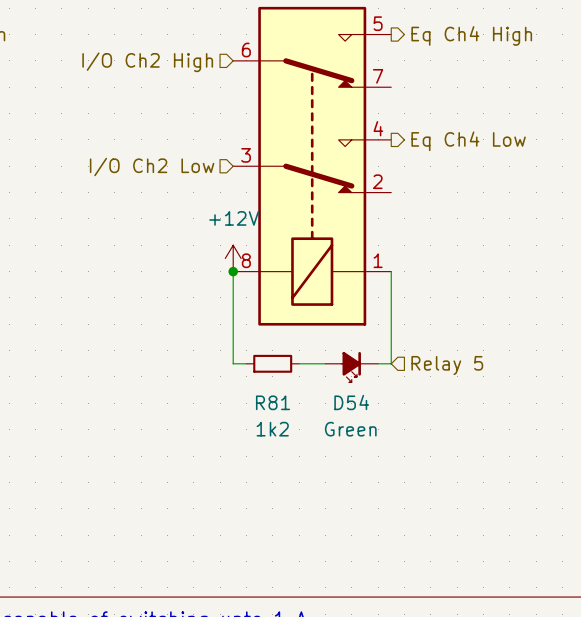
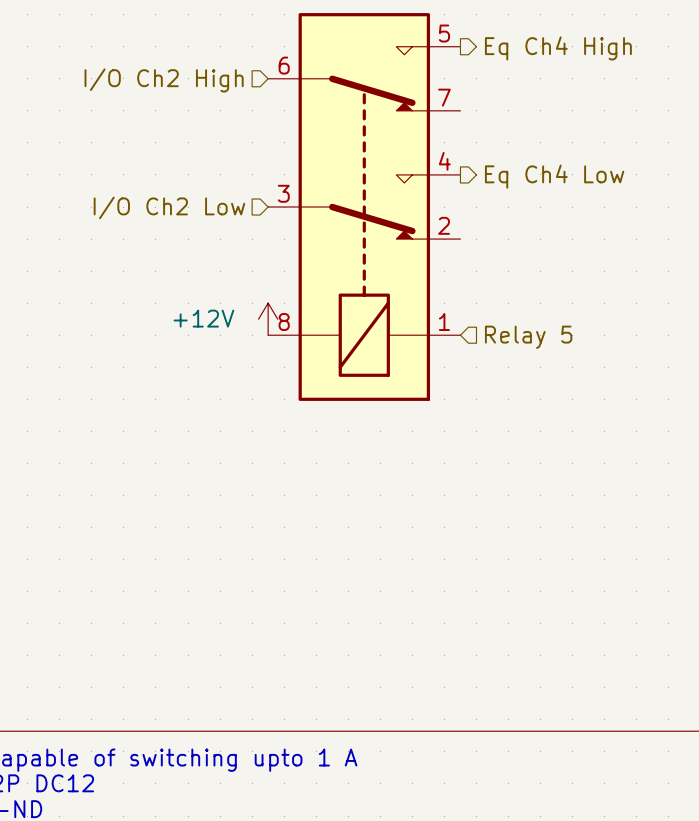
power symbol text position: +12V (234, 218) -> +12V (203, 318)
wire: (233, 271) (233, 363) (246, 363) -> none
junction: (233, 271) -> none
wire: (391, 271) (391, 363) (378, 363) -> none
R81: 1k2 (272, 363) -> none
wire: (299, 363) (325, 363) -> none
hierarchical label position: Relay 5 (447, 365) -> Relay 5 (528, 337)
D54: Green (351, 367) -> none

